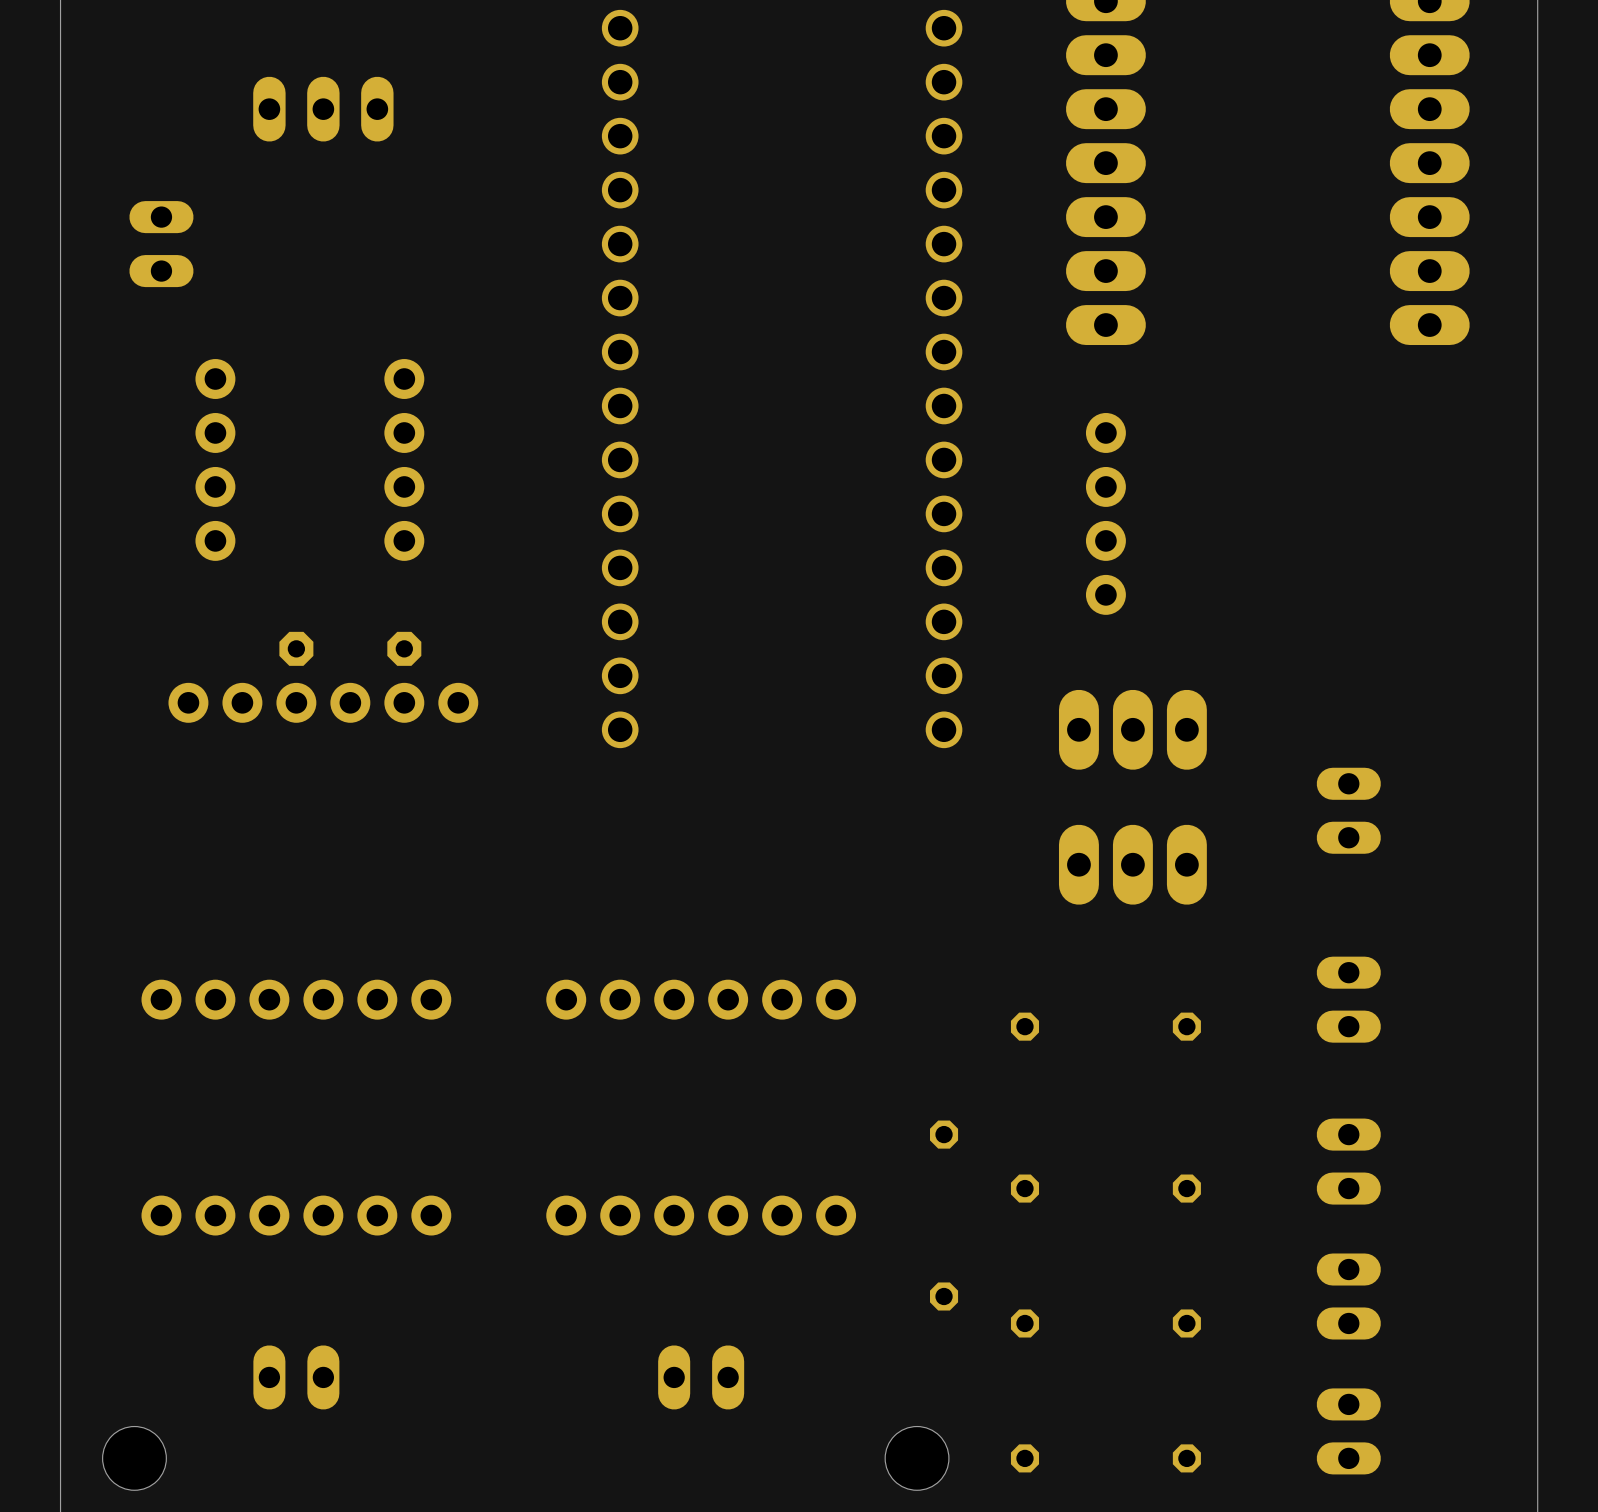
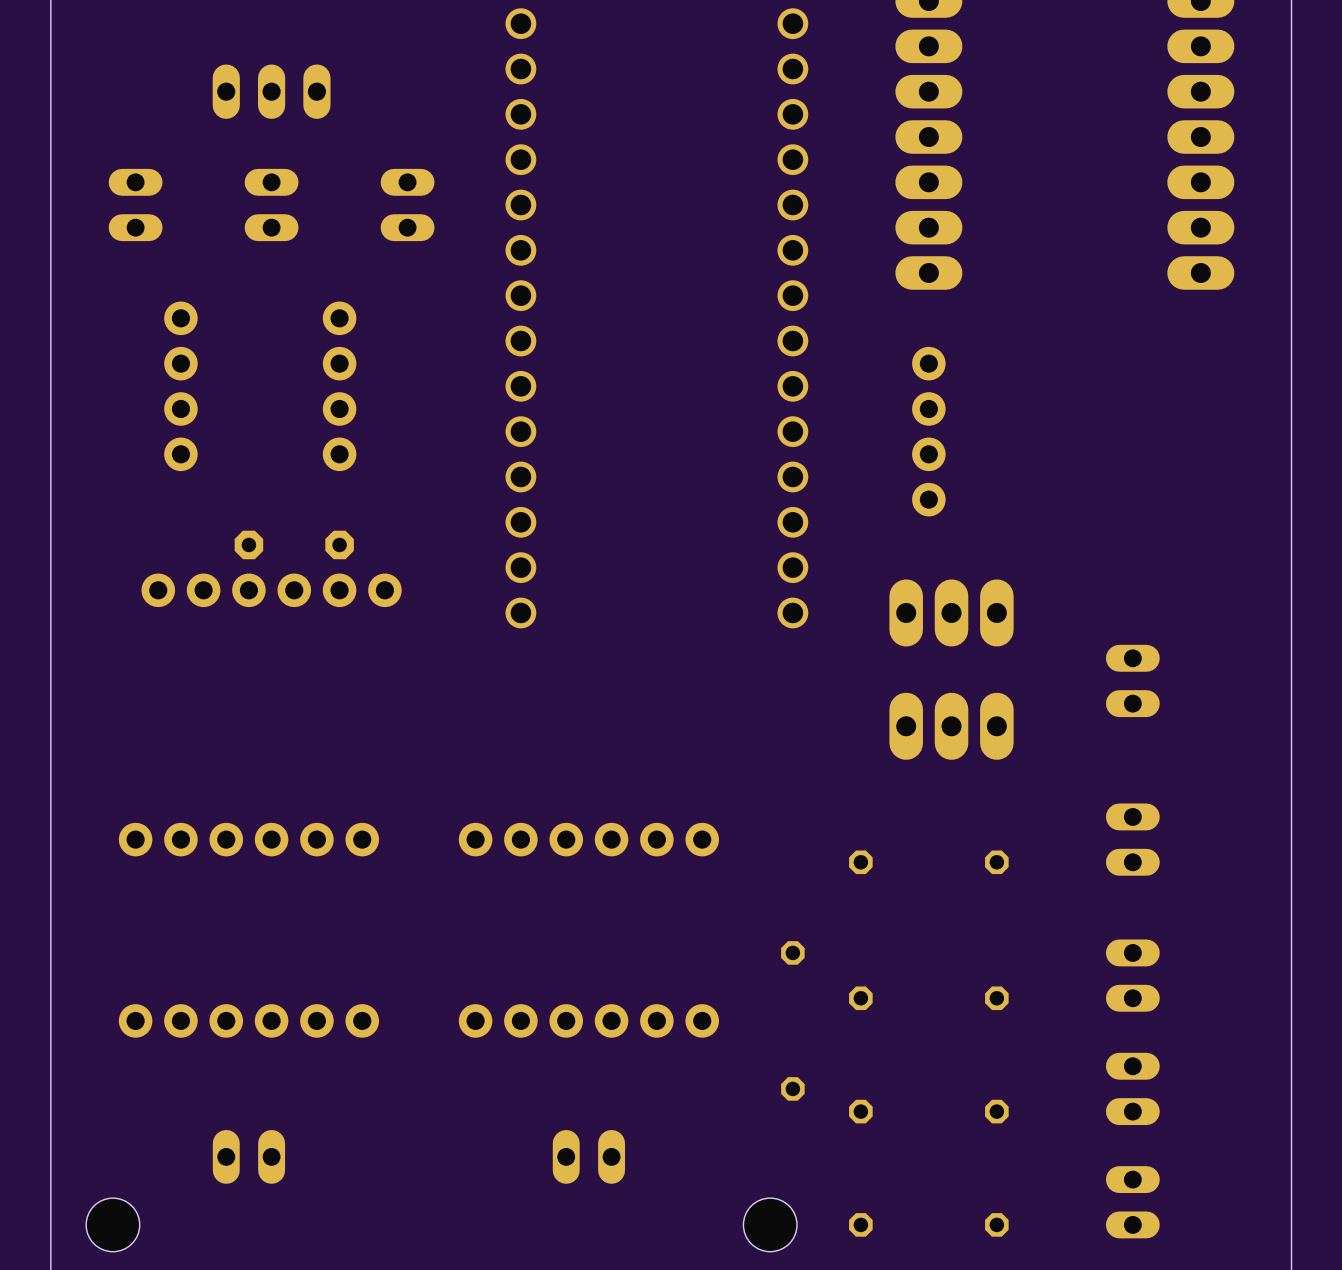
part: none -> (271, 205)
part: none -> (407, 205)

